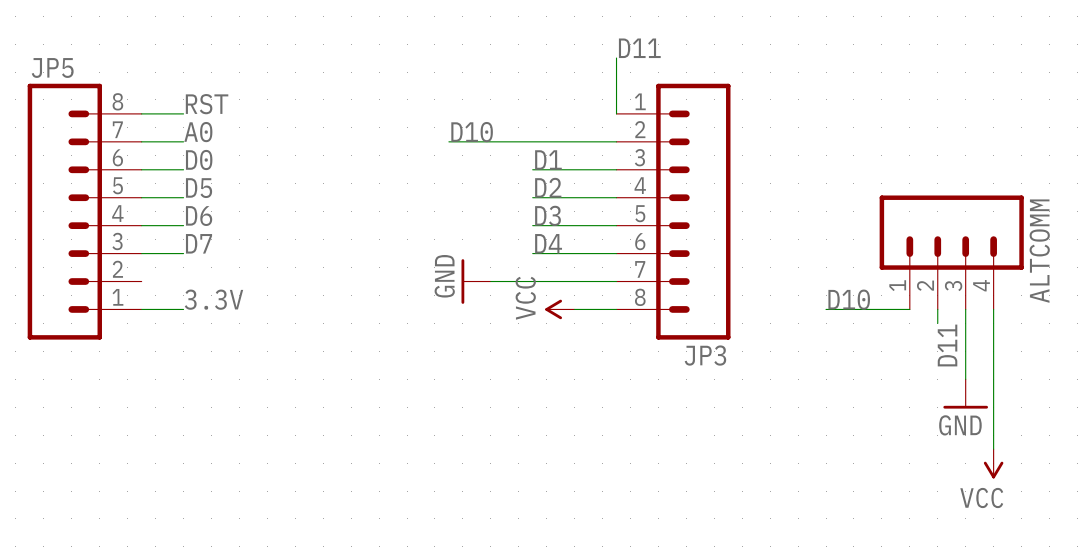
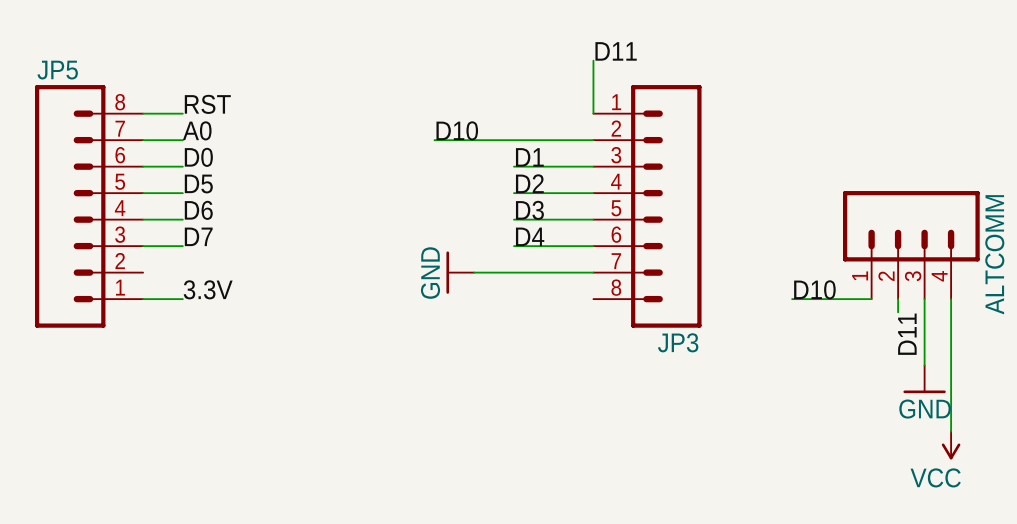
power symbol: VCC (559, 309) -> none
wire: (574, 309) (616, 309) -> none

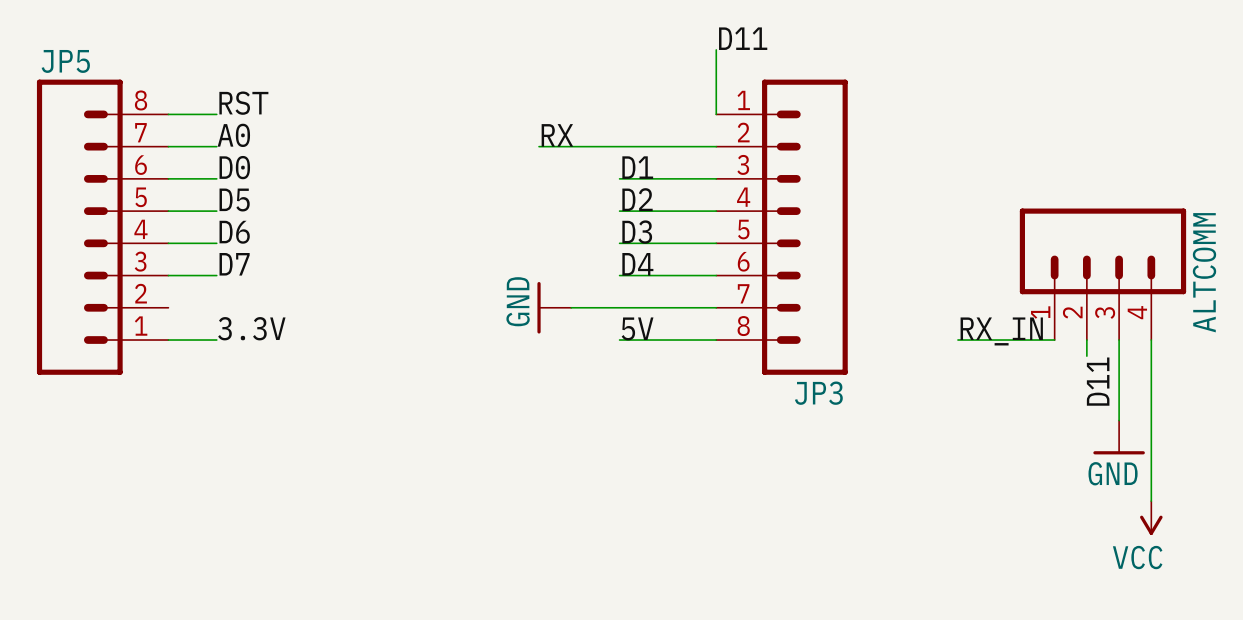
label: D10 (457, 130) -> none
label: none -> RX (557, 135)
wire: (434, 140) (447, 140) -> none
label: none -> 5V (637, 328)
label: D10 (814, 289) -> RX_IN (1001, 331)
wire: none -> (619, 340) (716, 340)

